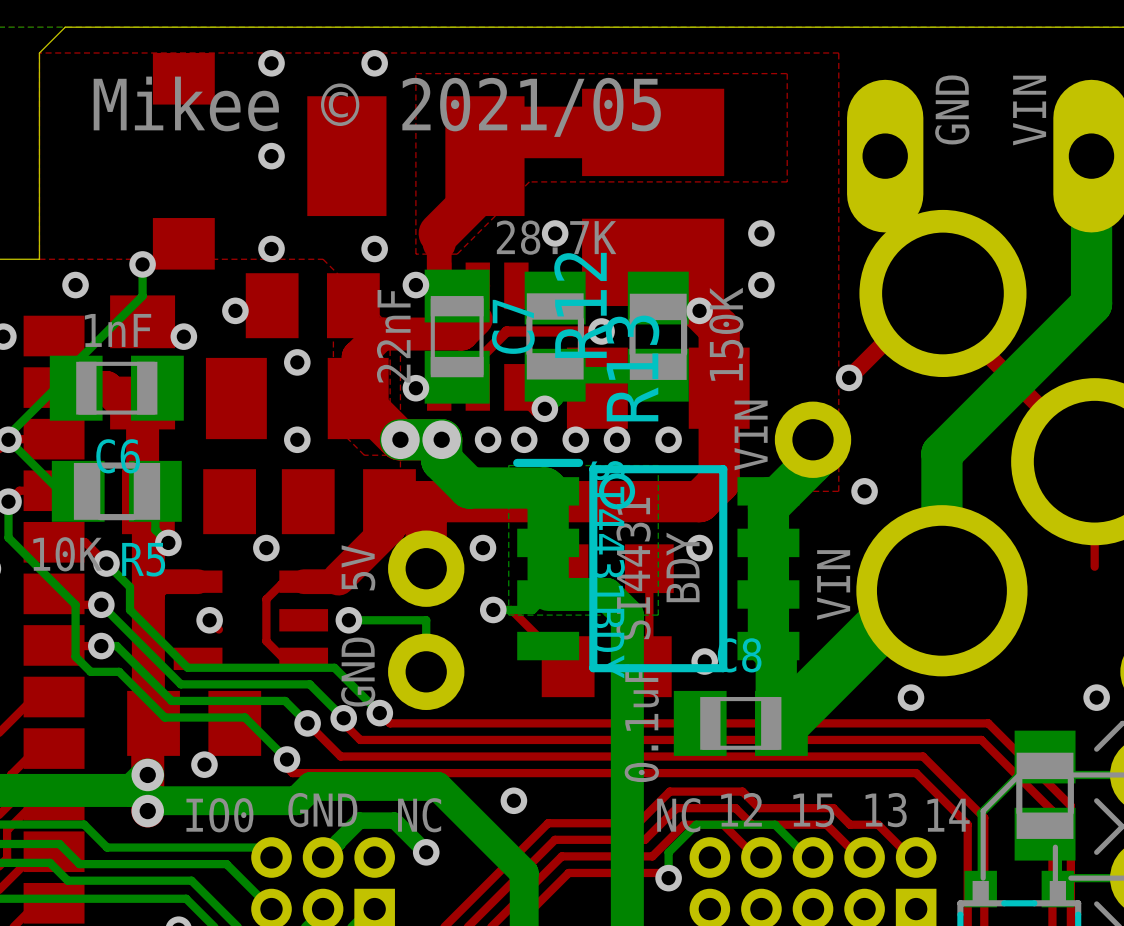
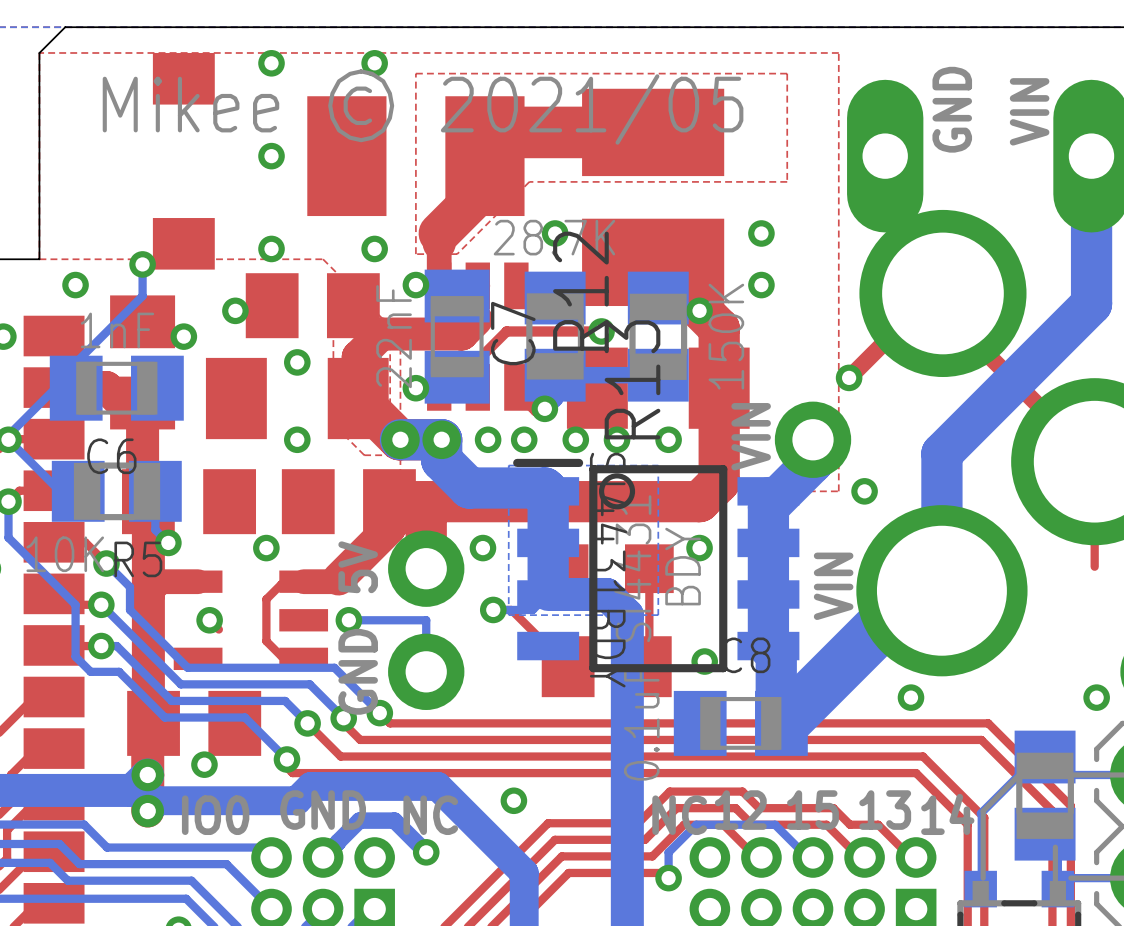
line: none -> (1096, 749) (1096, 759)
line: none -> (1096, 790) (1096, 800)
line: none -> (1096, 852) (1096, 862)
line: none -> (1096, 893) (1096, 903)

